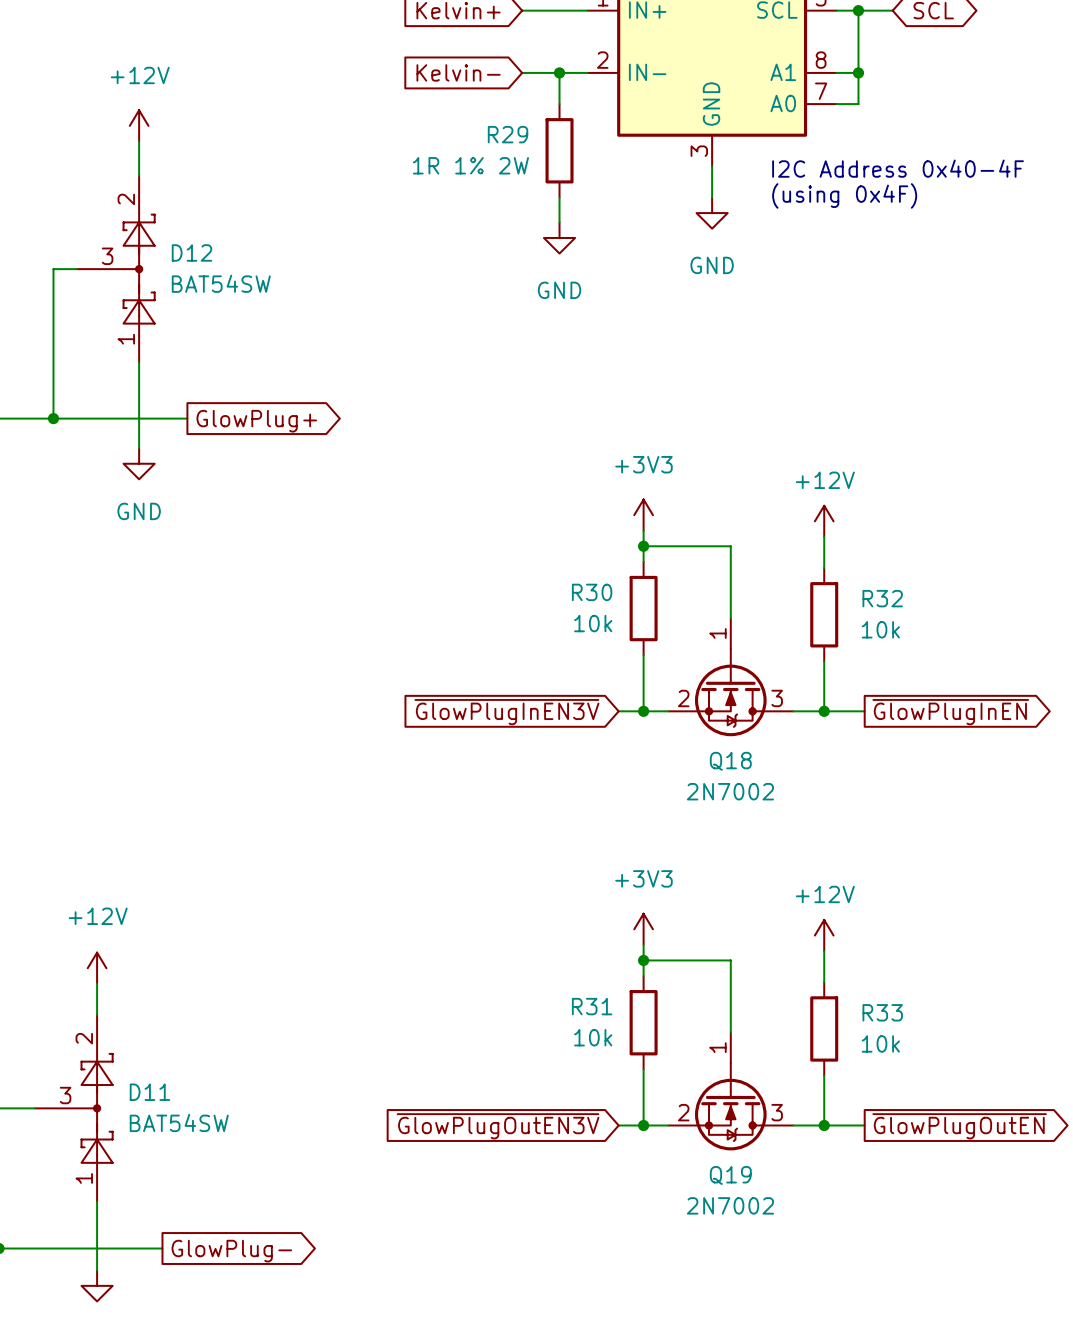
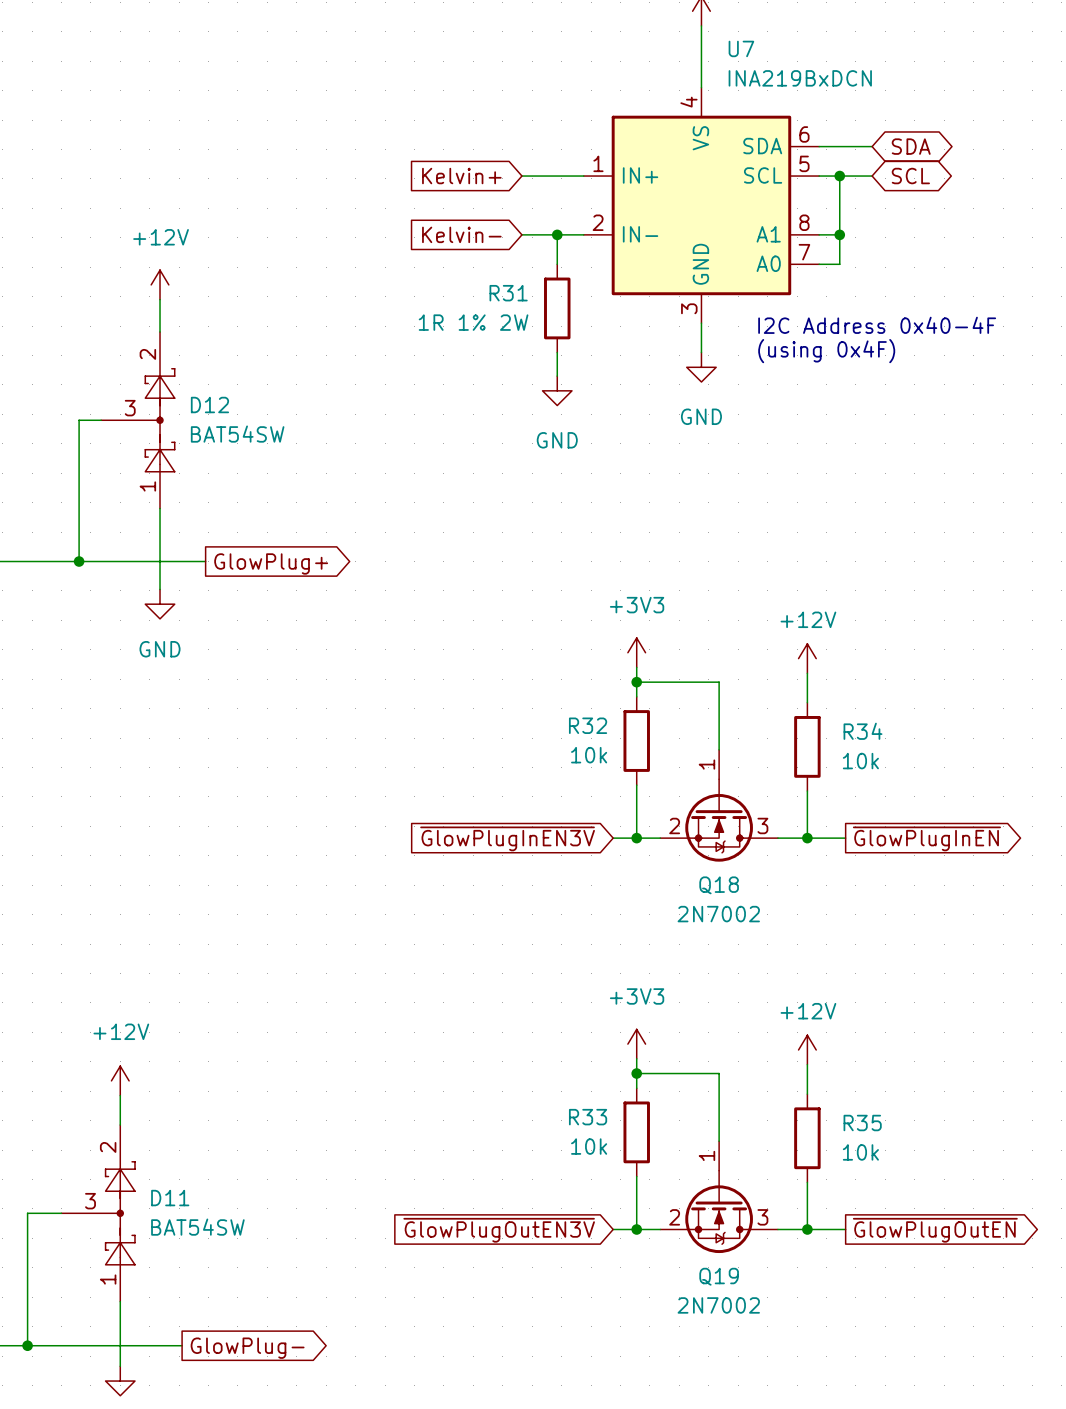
R29 name: R29 (508, 134) -> R31 (508, 293)
R30 name: R30 (592, 592) -> R32 (588, 725)
R32 name: R32 (882, 598) -> R34 (862, 731)
R31 name: R31 (592, 1006) -> R33 (588, 1117)
R33 name: R33 (882, 1012) -> R35 (862, 1123)

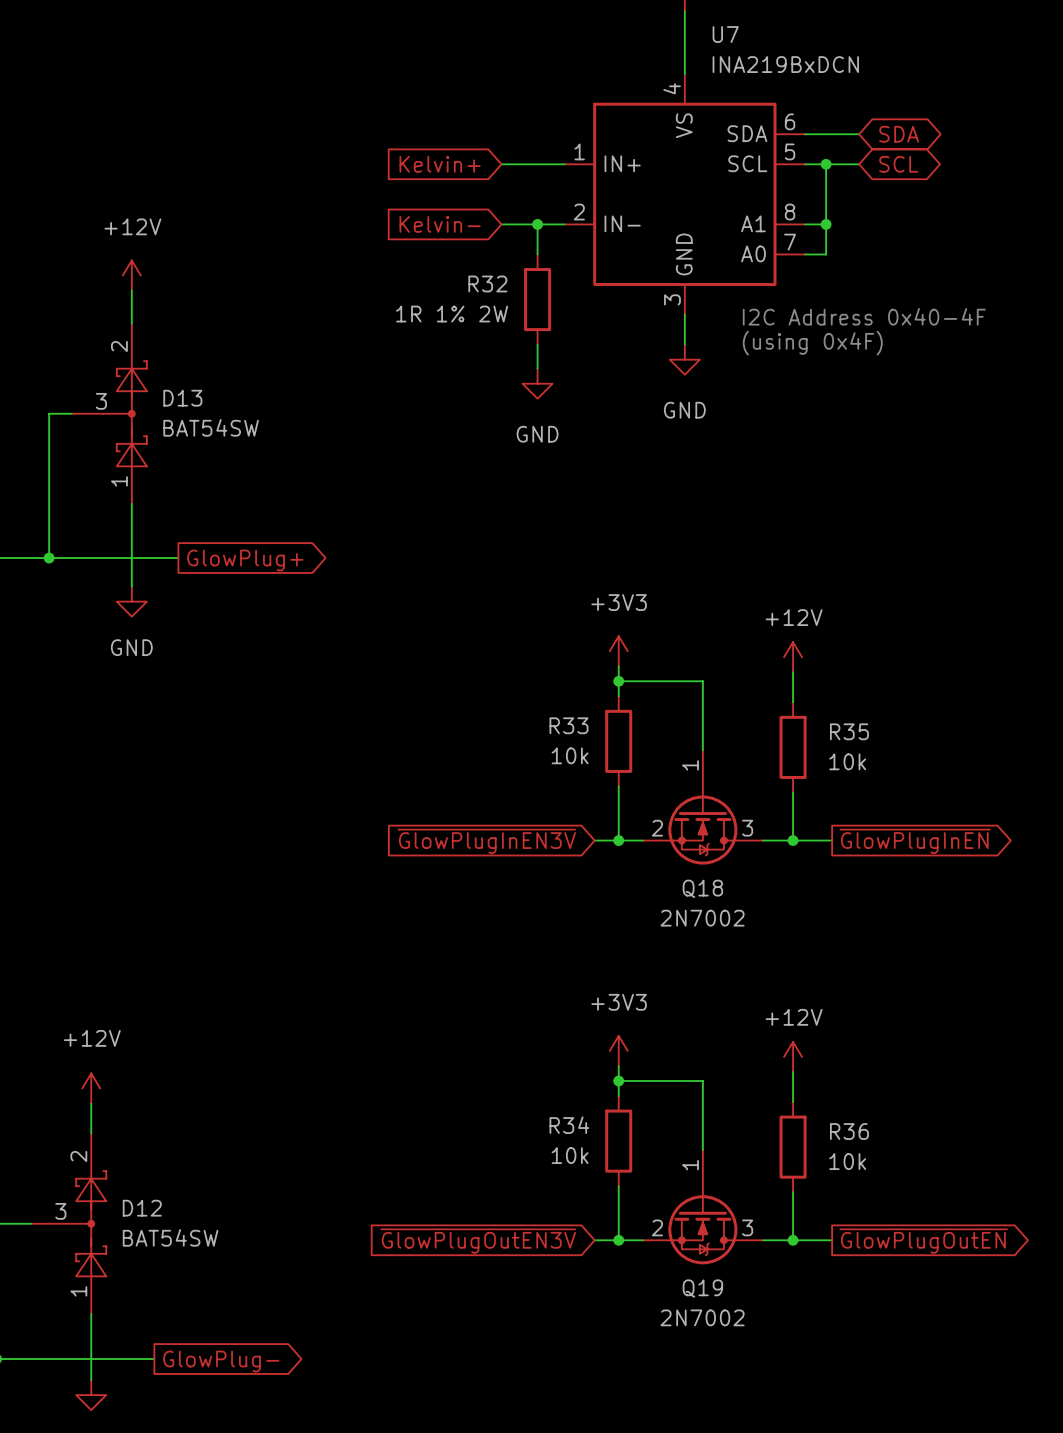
R31 name: R31 (508, 293) -> R32 (487, 283)
D12 name: D12 (209, 405) -> D13 (182, 398)
R32 name: R32 (588, 725) -> R33 (569, 725)
R34 name: R34 (862, 731) -> R35 (849, 731)
R33 name: R33 (588, 1117) -> R34 (569, 1125)
R35 name: R35 (862, 1123) -> R36 (849, 1131)
D11 name: D11 (170, 1198) -> D12 (142, 1208)

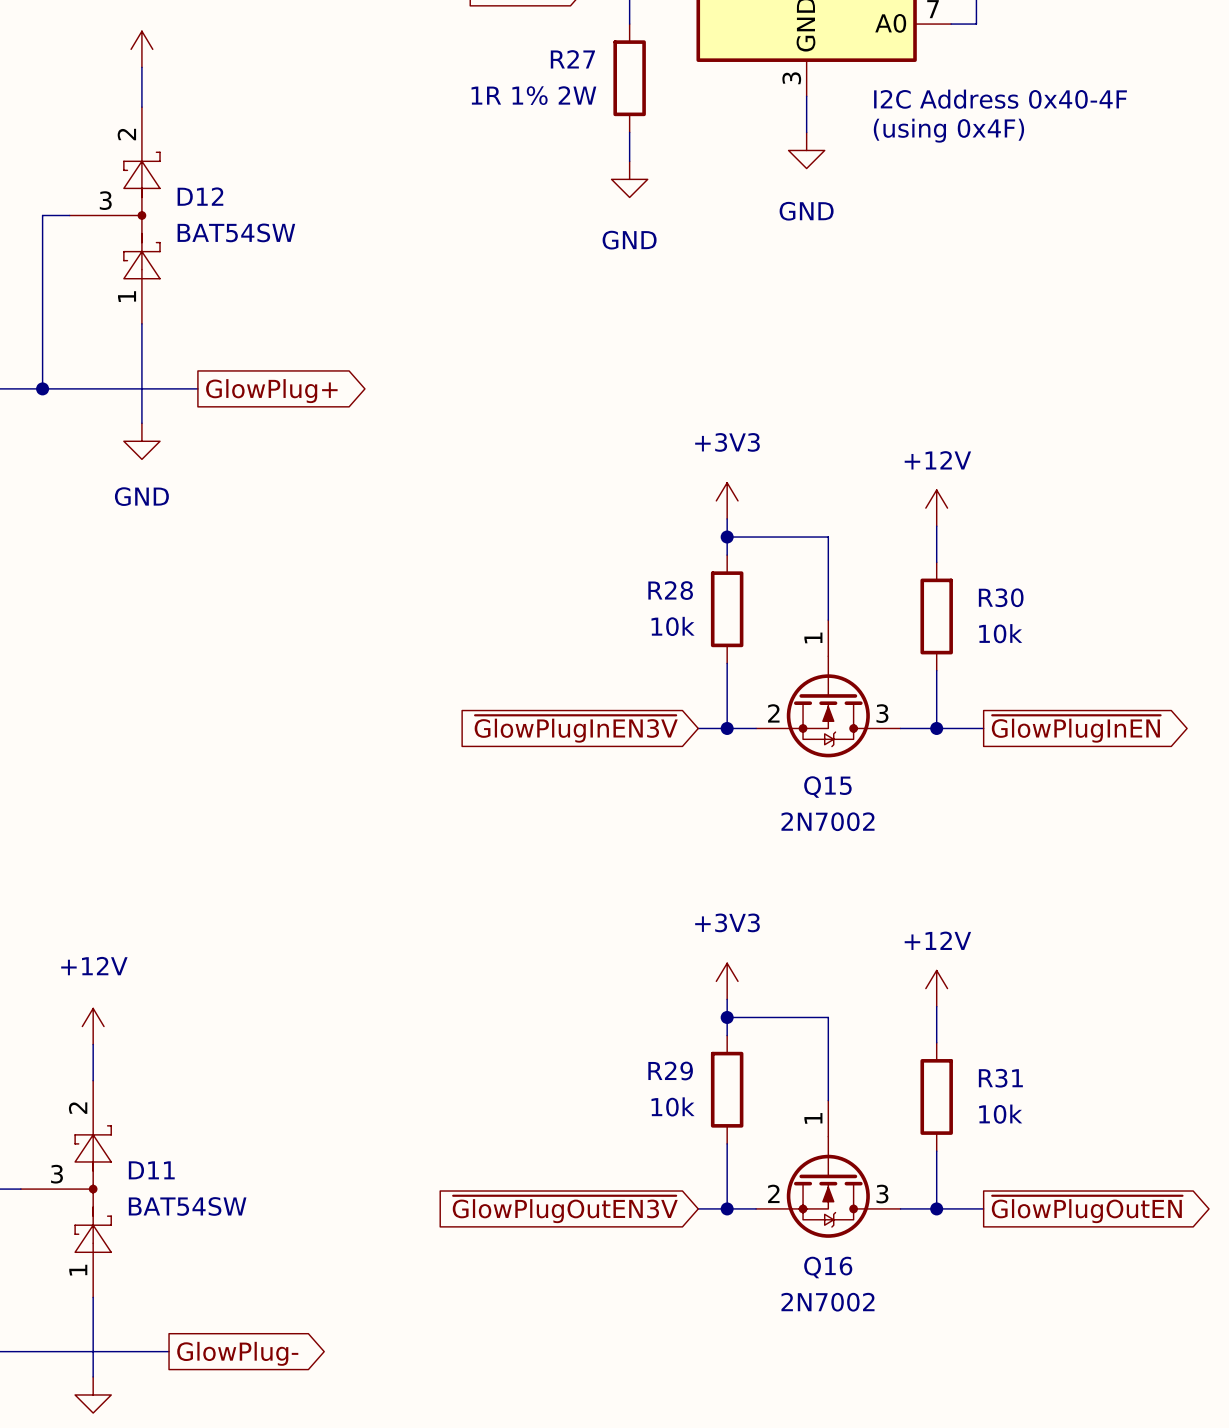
R32 name: R32 (487, 283) -> R27 (572, 59)
D13 name: D13 (182, 398) -> D12 (200, 196)
R33 name: R33 (569, 725) -> R28 (670, 590)
R35 name: R35 (849, 731) -> R30 (1001, 597)
Q18 name: Q18 (702, 888) -> Q15 (827, 787)
R34 name: R34 (569, 1125) -> R29 (670, 1071)
R36 name: R36 (849, 1131) -> R31 (1000, 1078)
D12 name: D12 (142, 1208) -> D11 (151, 1170)
Q19 name: Q19 (702, 1288) -> Q16 (828, 1267)

